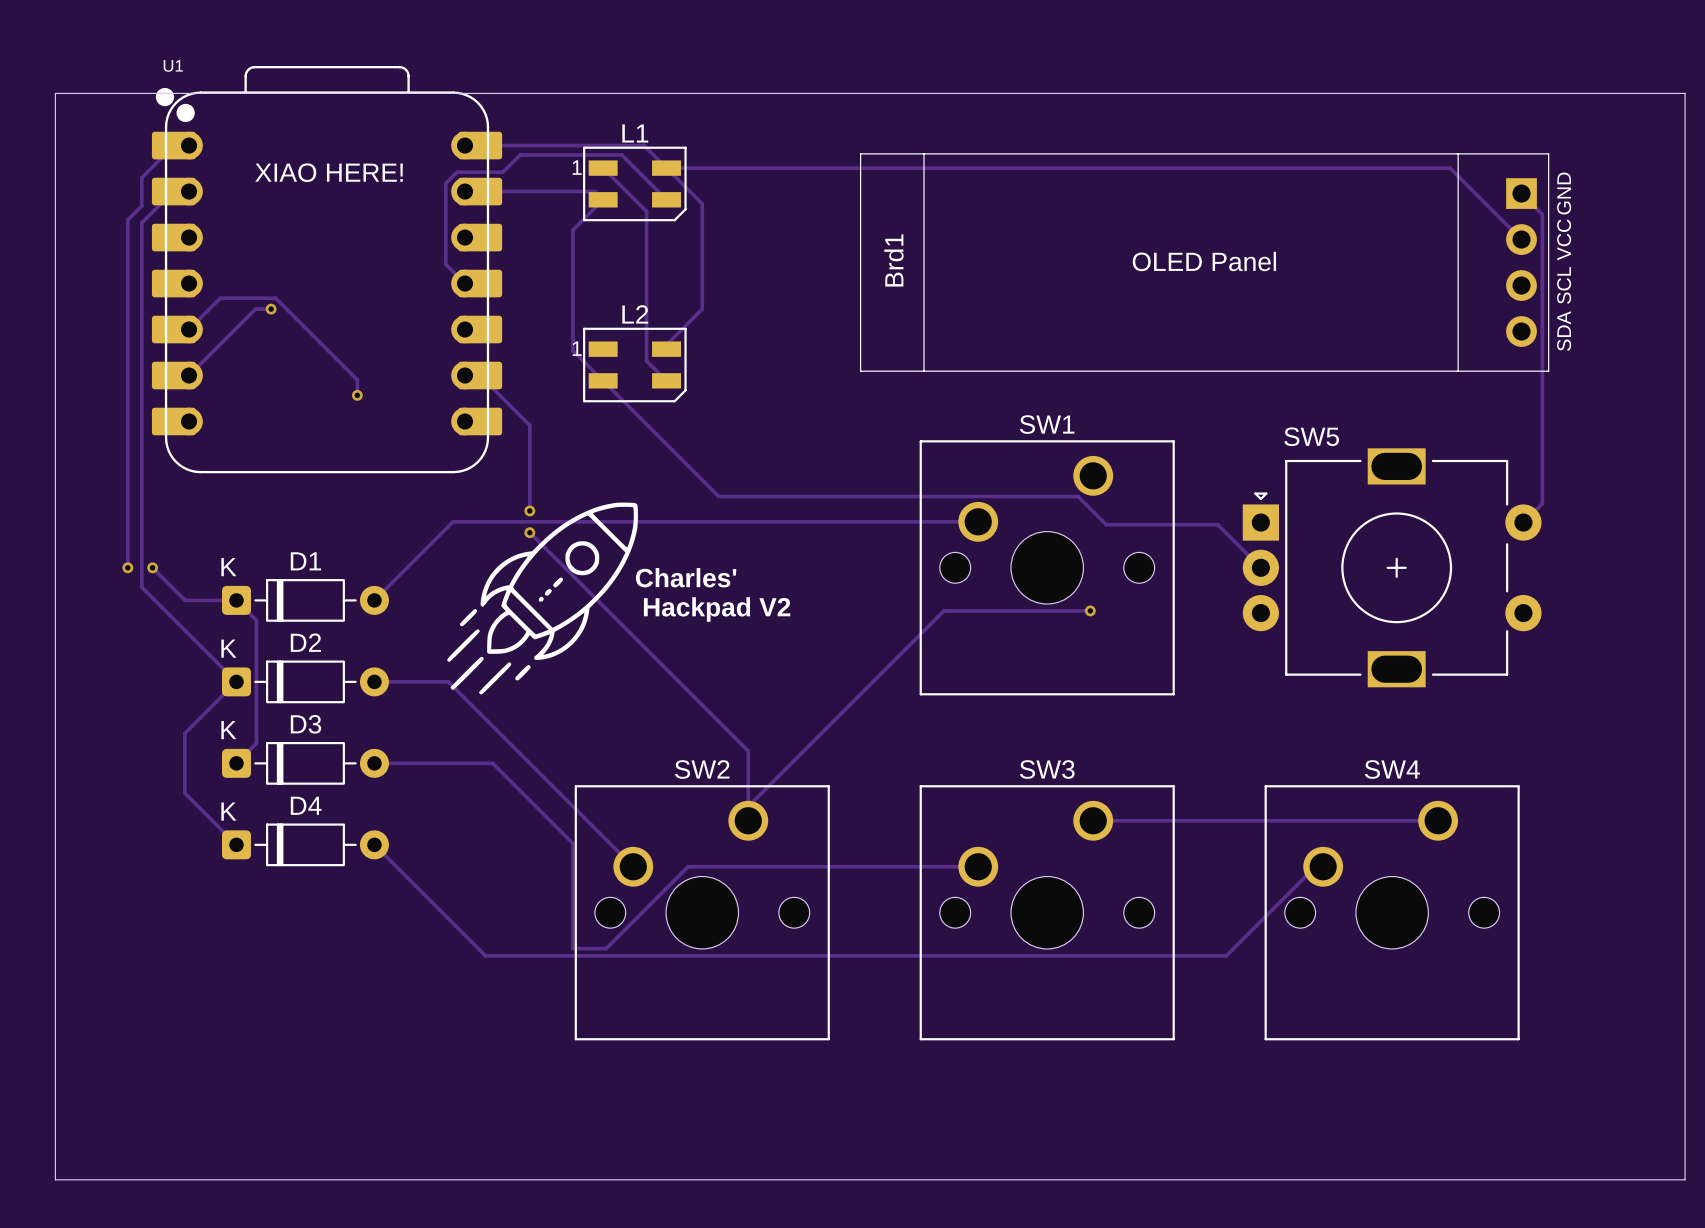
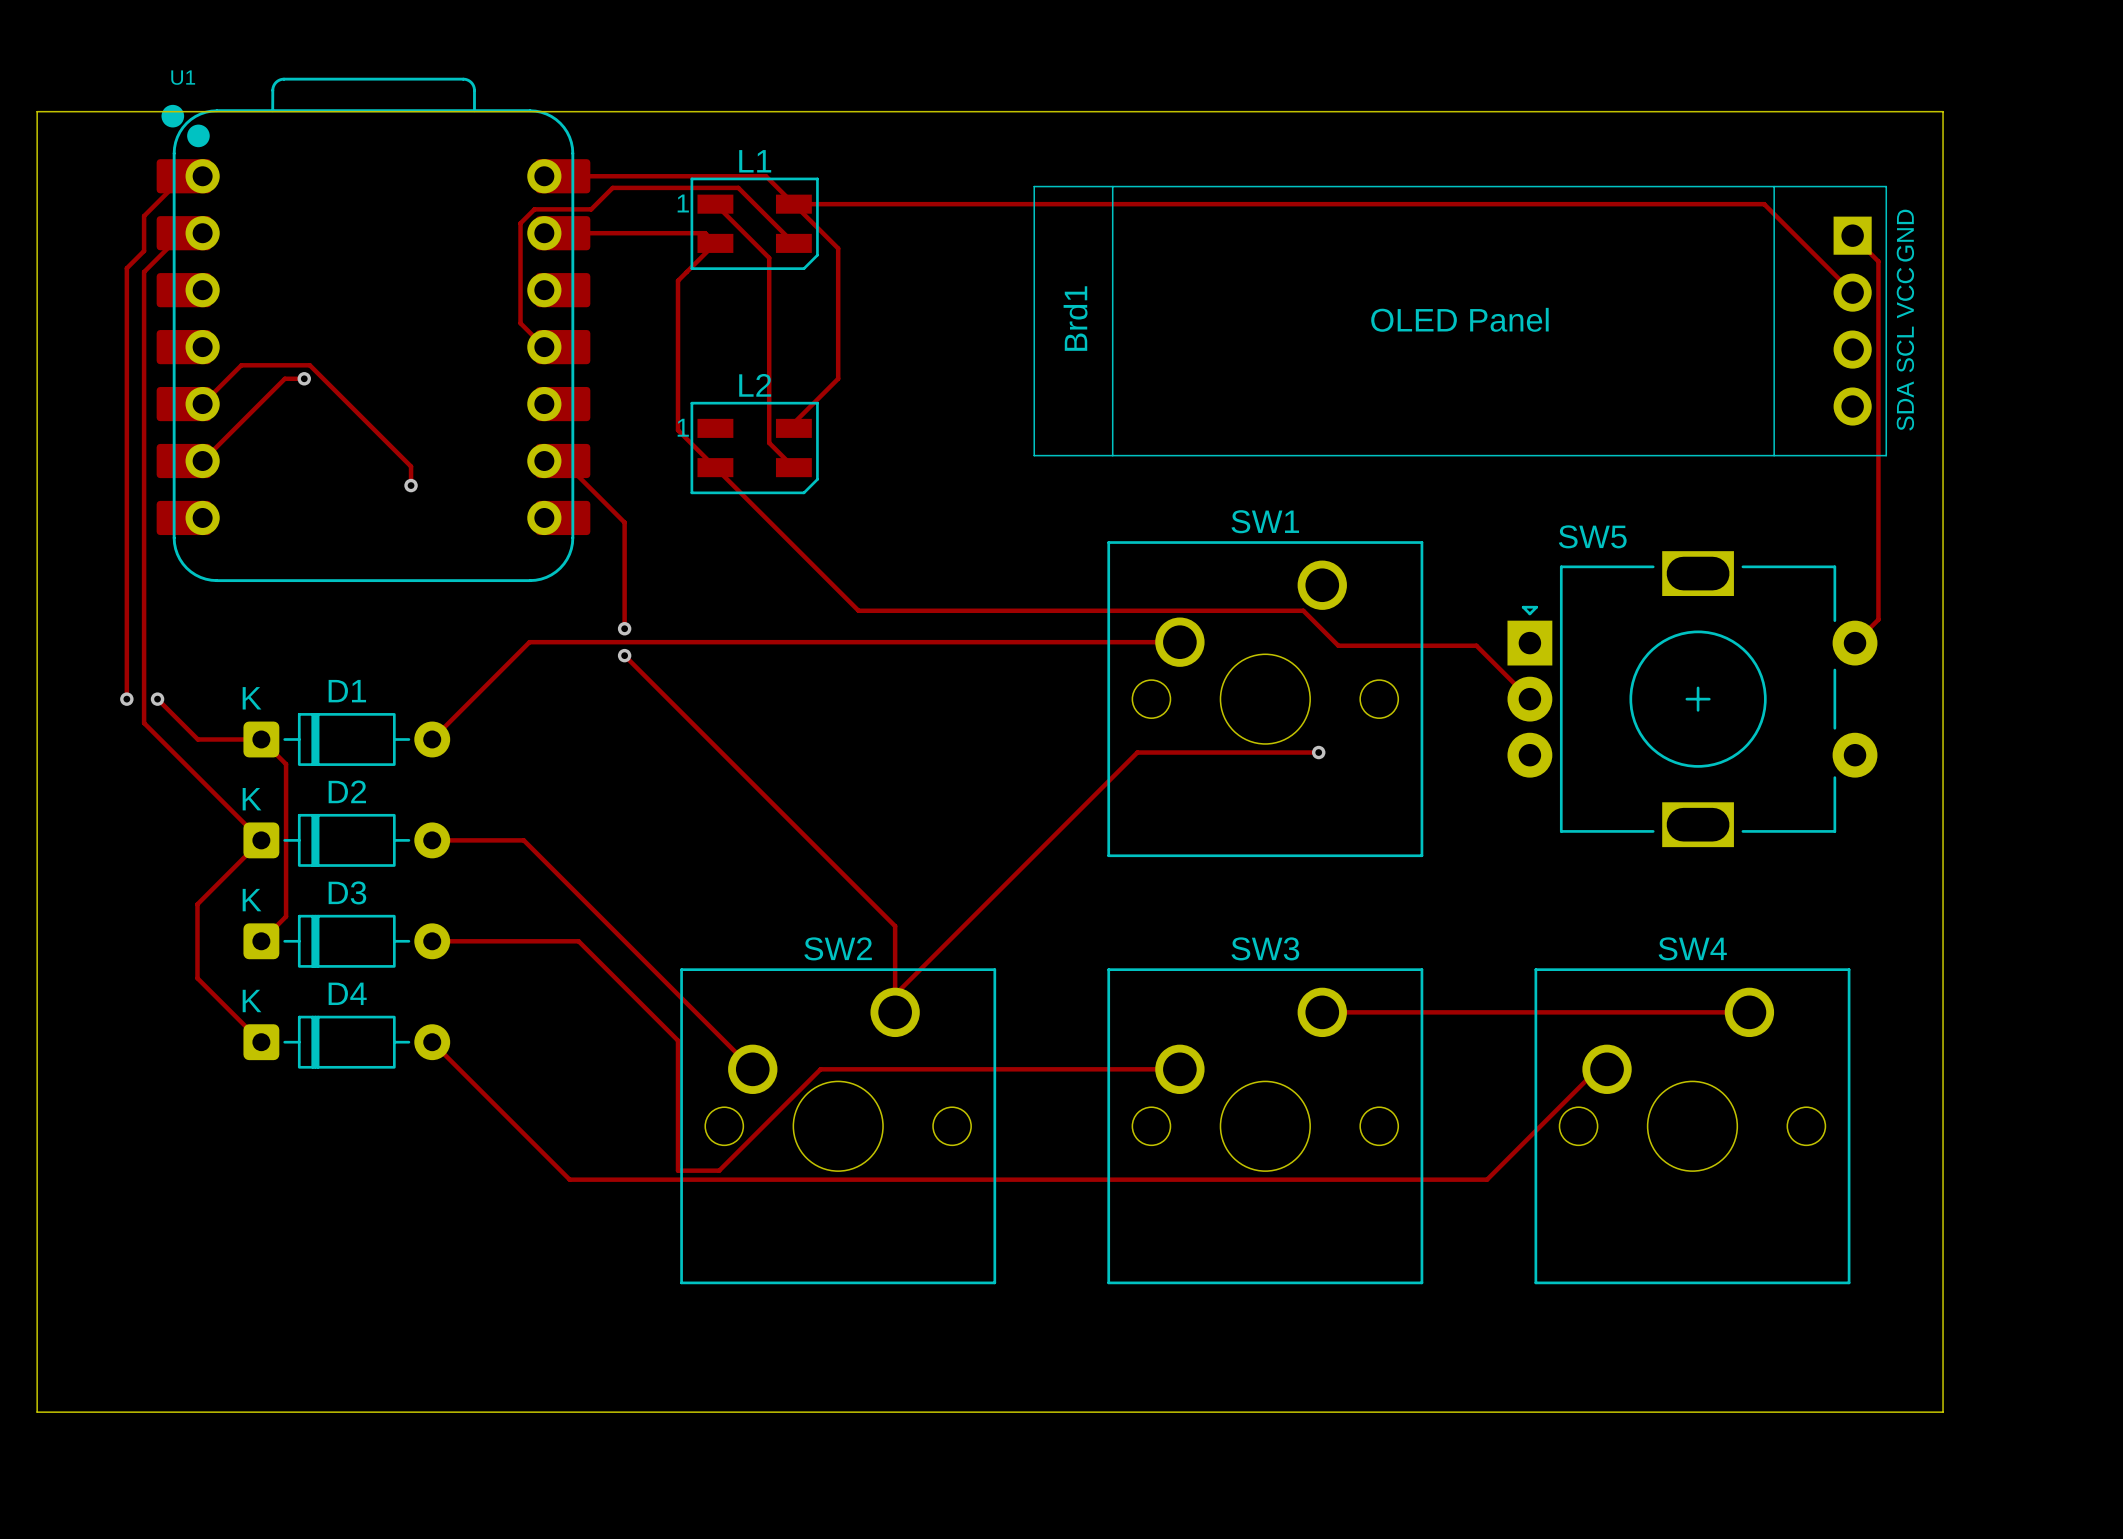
board edge: (1594, 93) (1685, 93) (1685, 1179) (55, 1179) (55, 1143) -> (1943, 111) (1943, 1412) (37, 1412)
text: XIAO HERE! (329, 172) -> none
drawing: [447, 502, 638, 695] -> none
text: Charles' (686, 577) -> none
text: Hackpad V2 (717, 609) -> none

